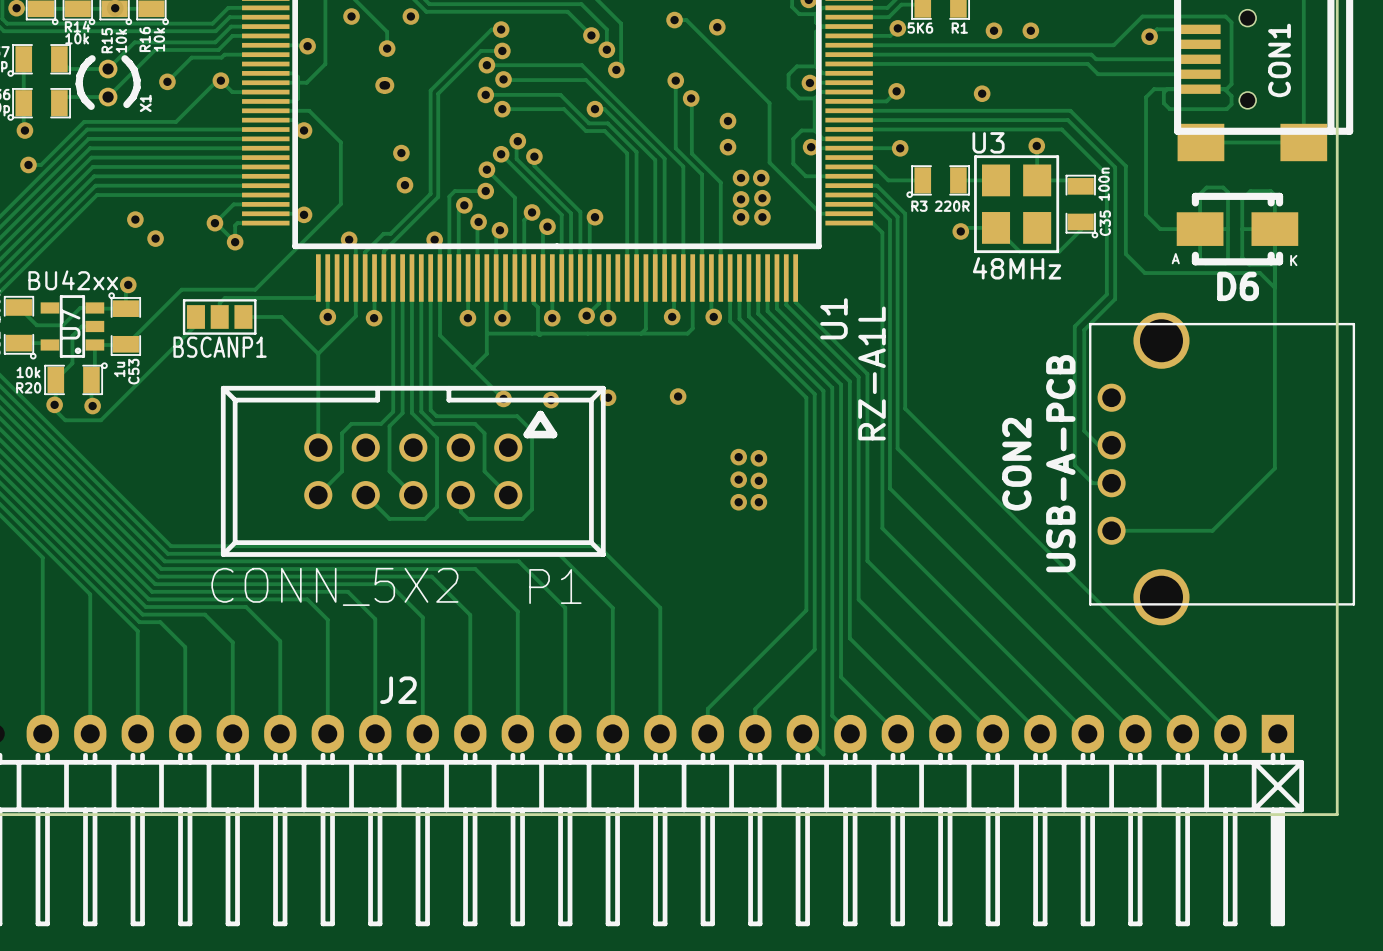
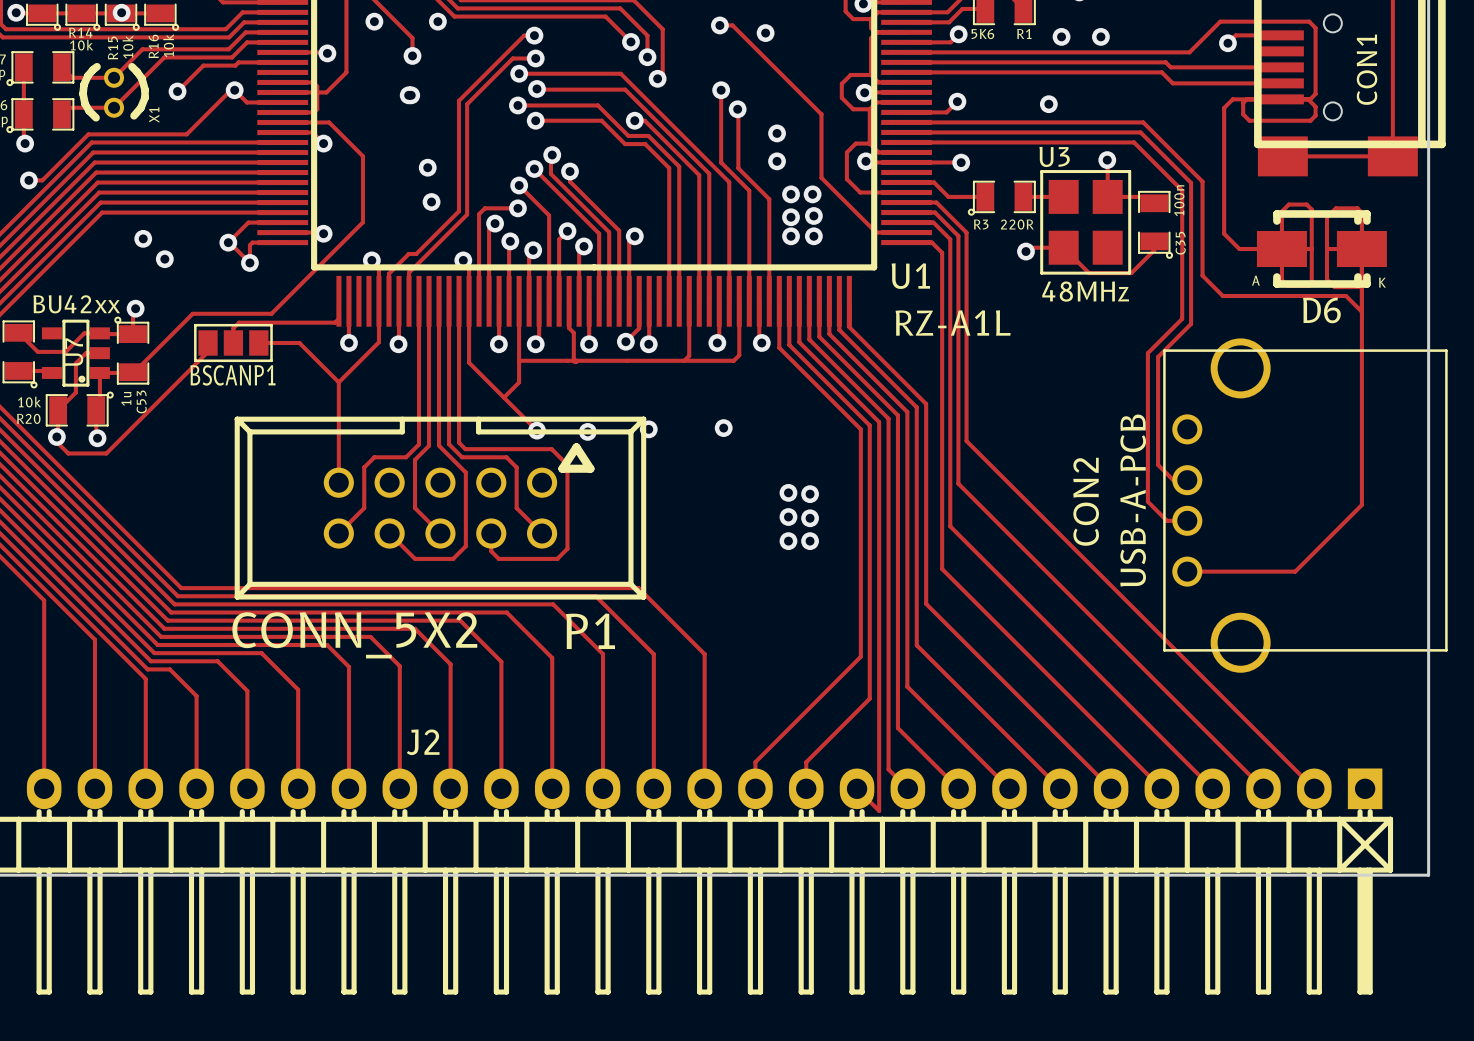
U1 name rotation: 0° (833, 318) -> 90° clockwise (910, 276)
U1 name position: U1 (833, 318) -> U1 (910, 276)
U1 value rotation: 0° (872, 373) -> 90° clockwise (953, 322)

